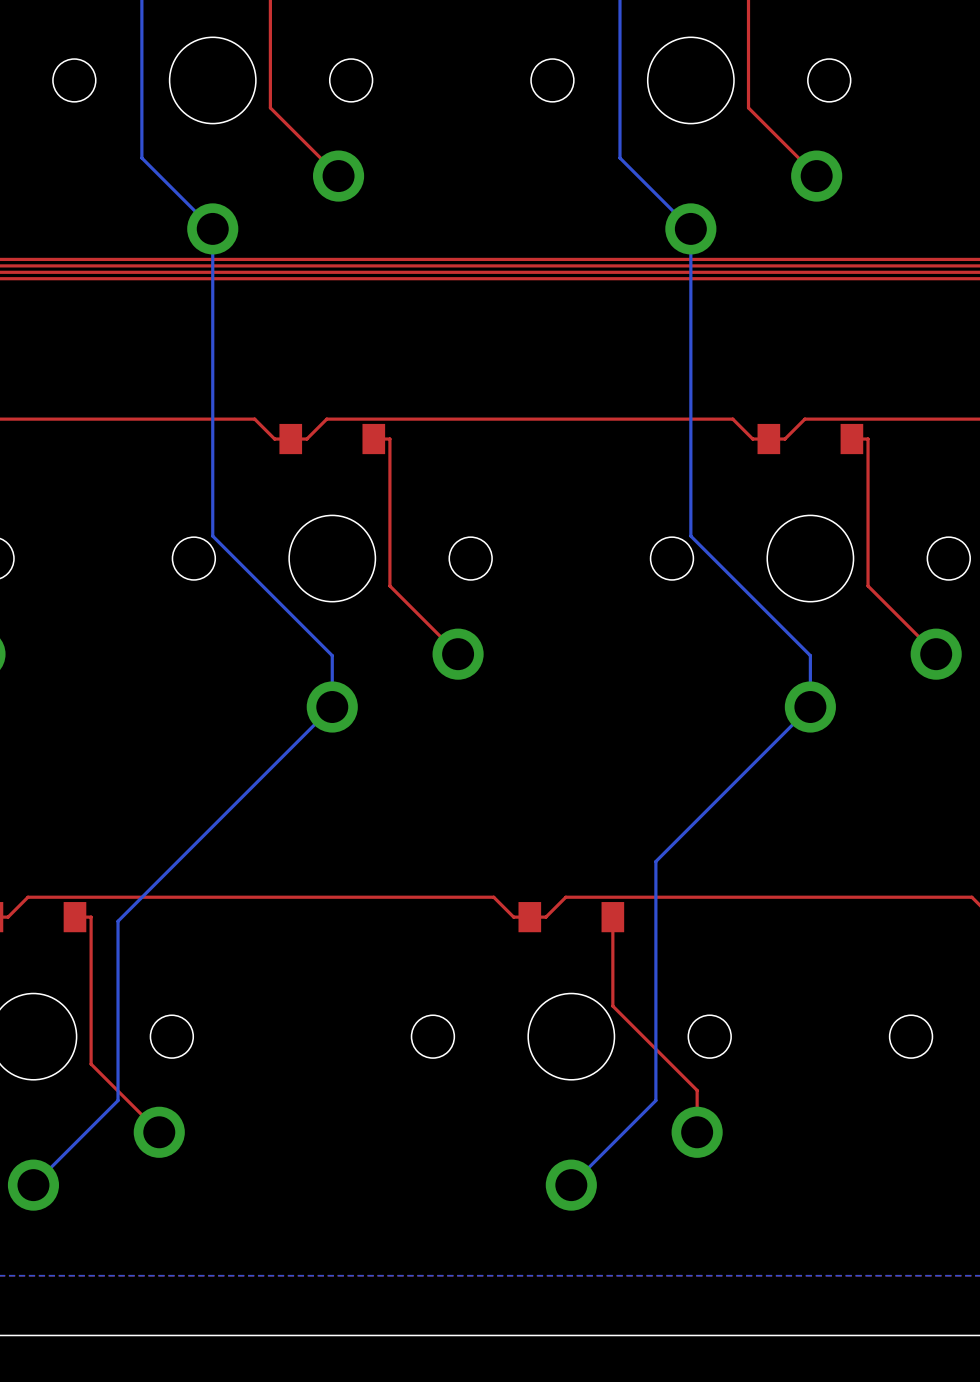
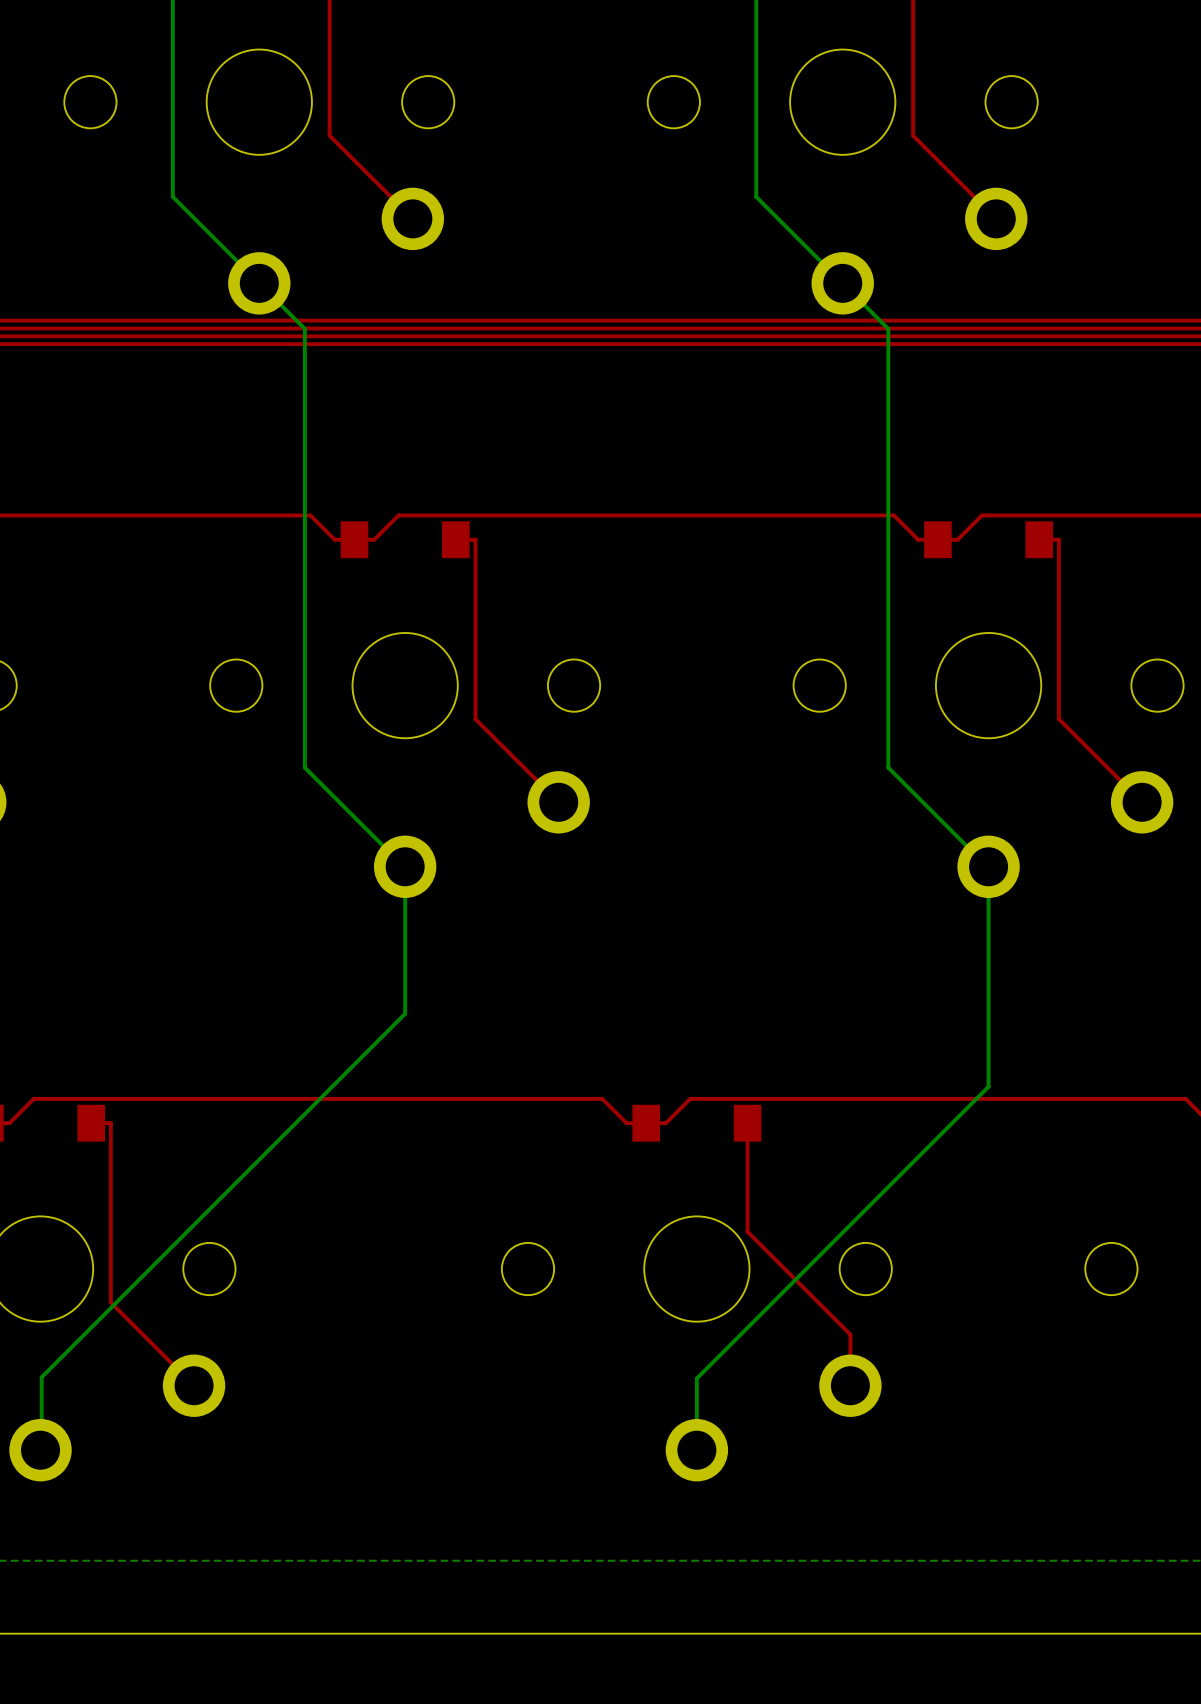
bottom track: (212, 228) (212, 536) (332, 655) (332, 707) (118, 921) (118, 1100) (33, 1185) -> (259, 283) (304, 328) (304, 767) (405, 866) (405, 1013) (41, 1377) (41, 1451)
bottom track: (690, 228) (690, 536) (810, 655) (810, 707) (655, 861) (655, 1100) (571, 1185) -> (842, 283) (888, 328) (888, 767) (988, 866) (988, 1086) (696, 1378) (696, 1450)

